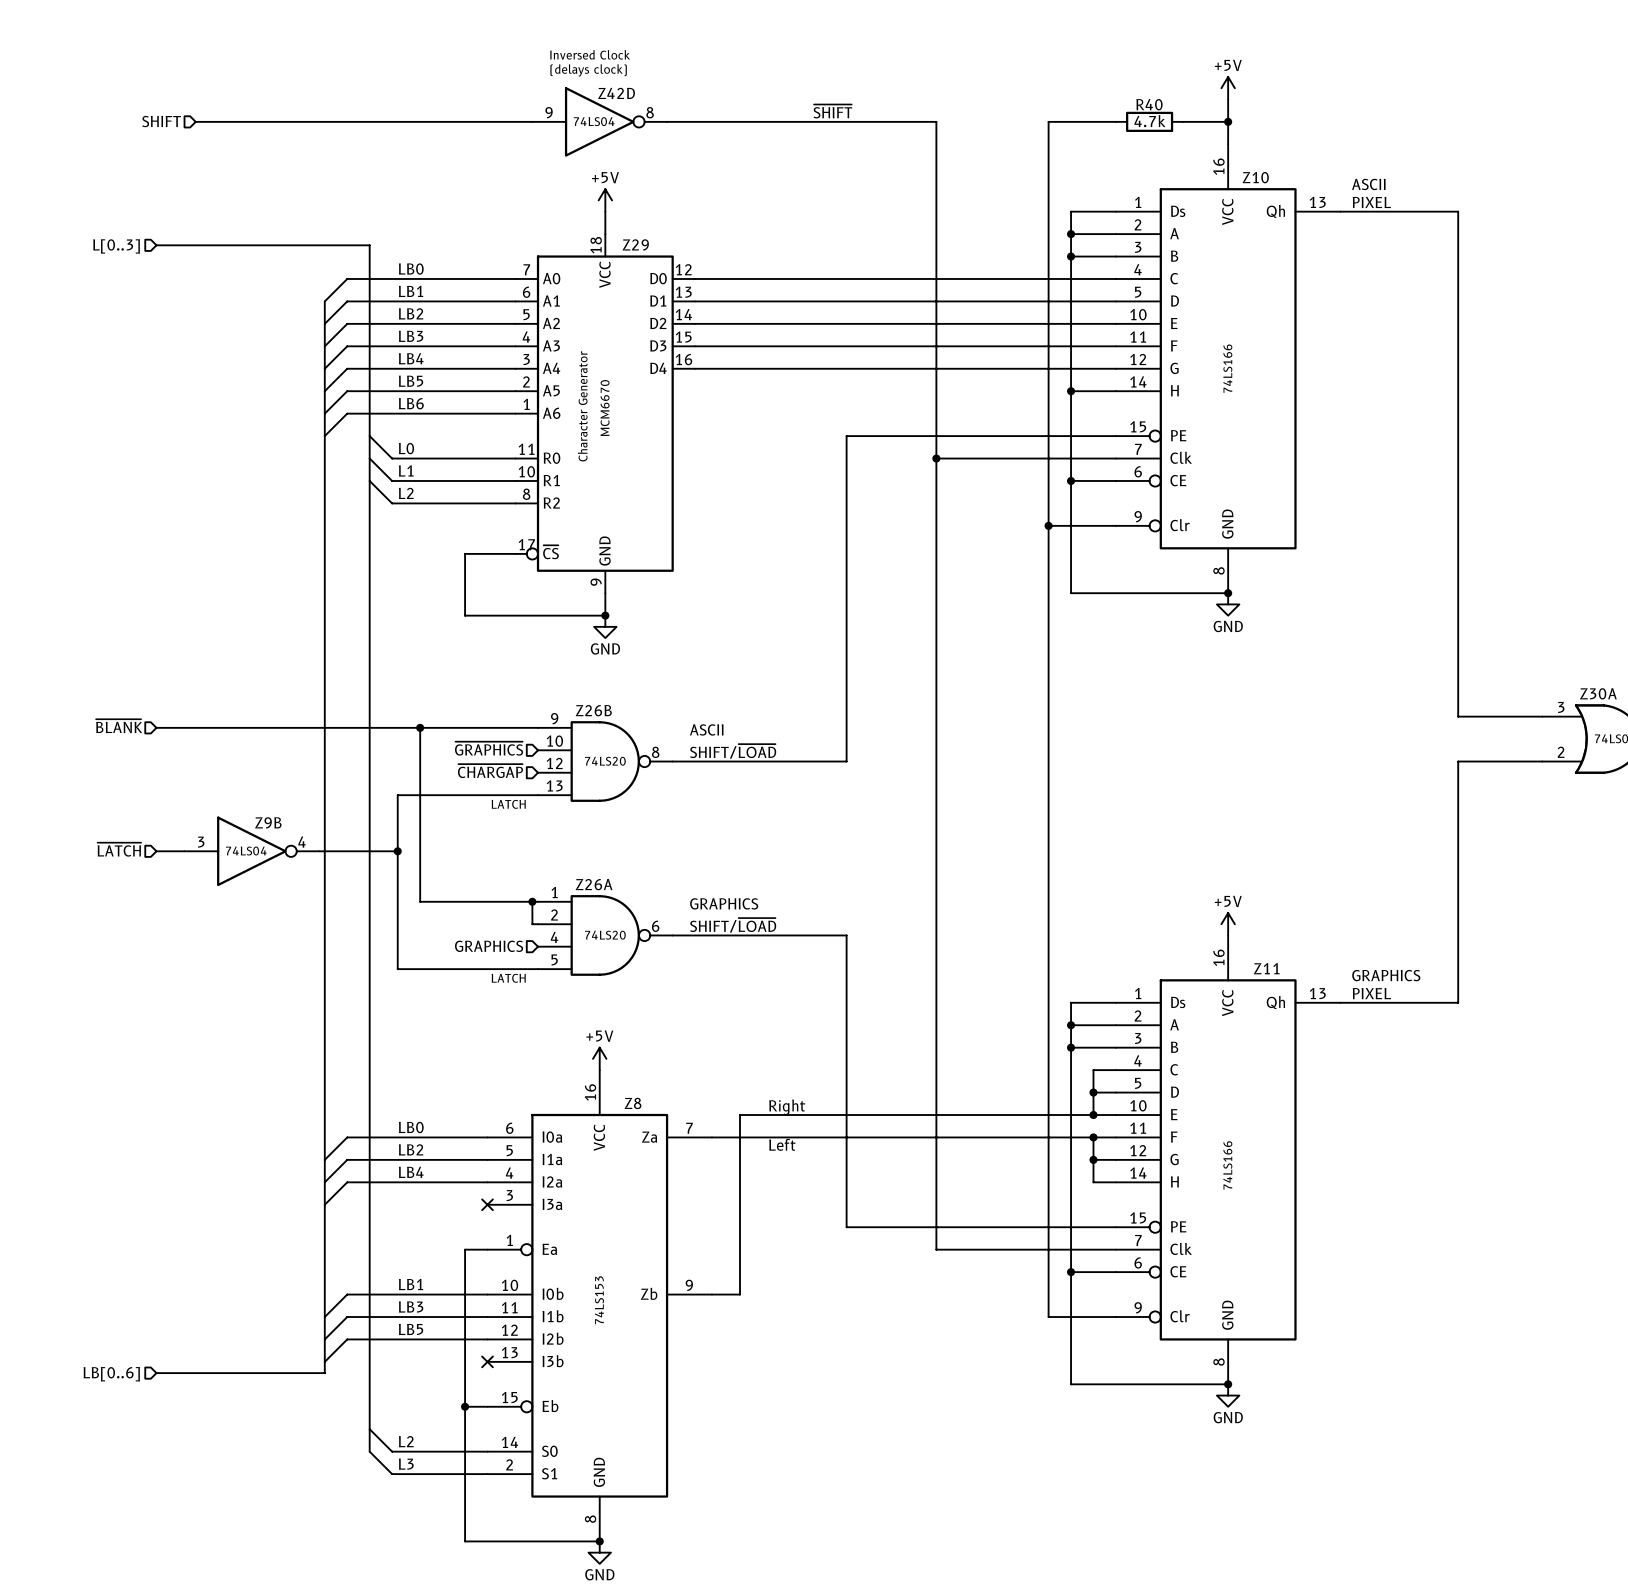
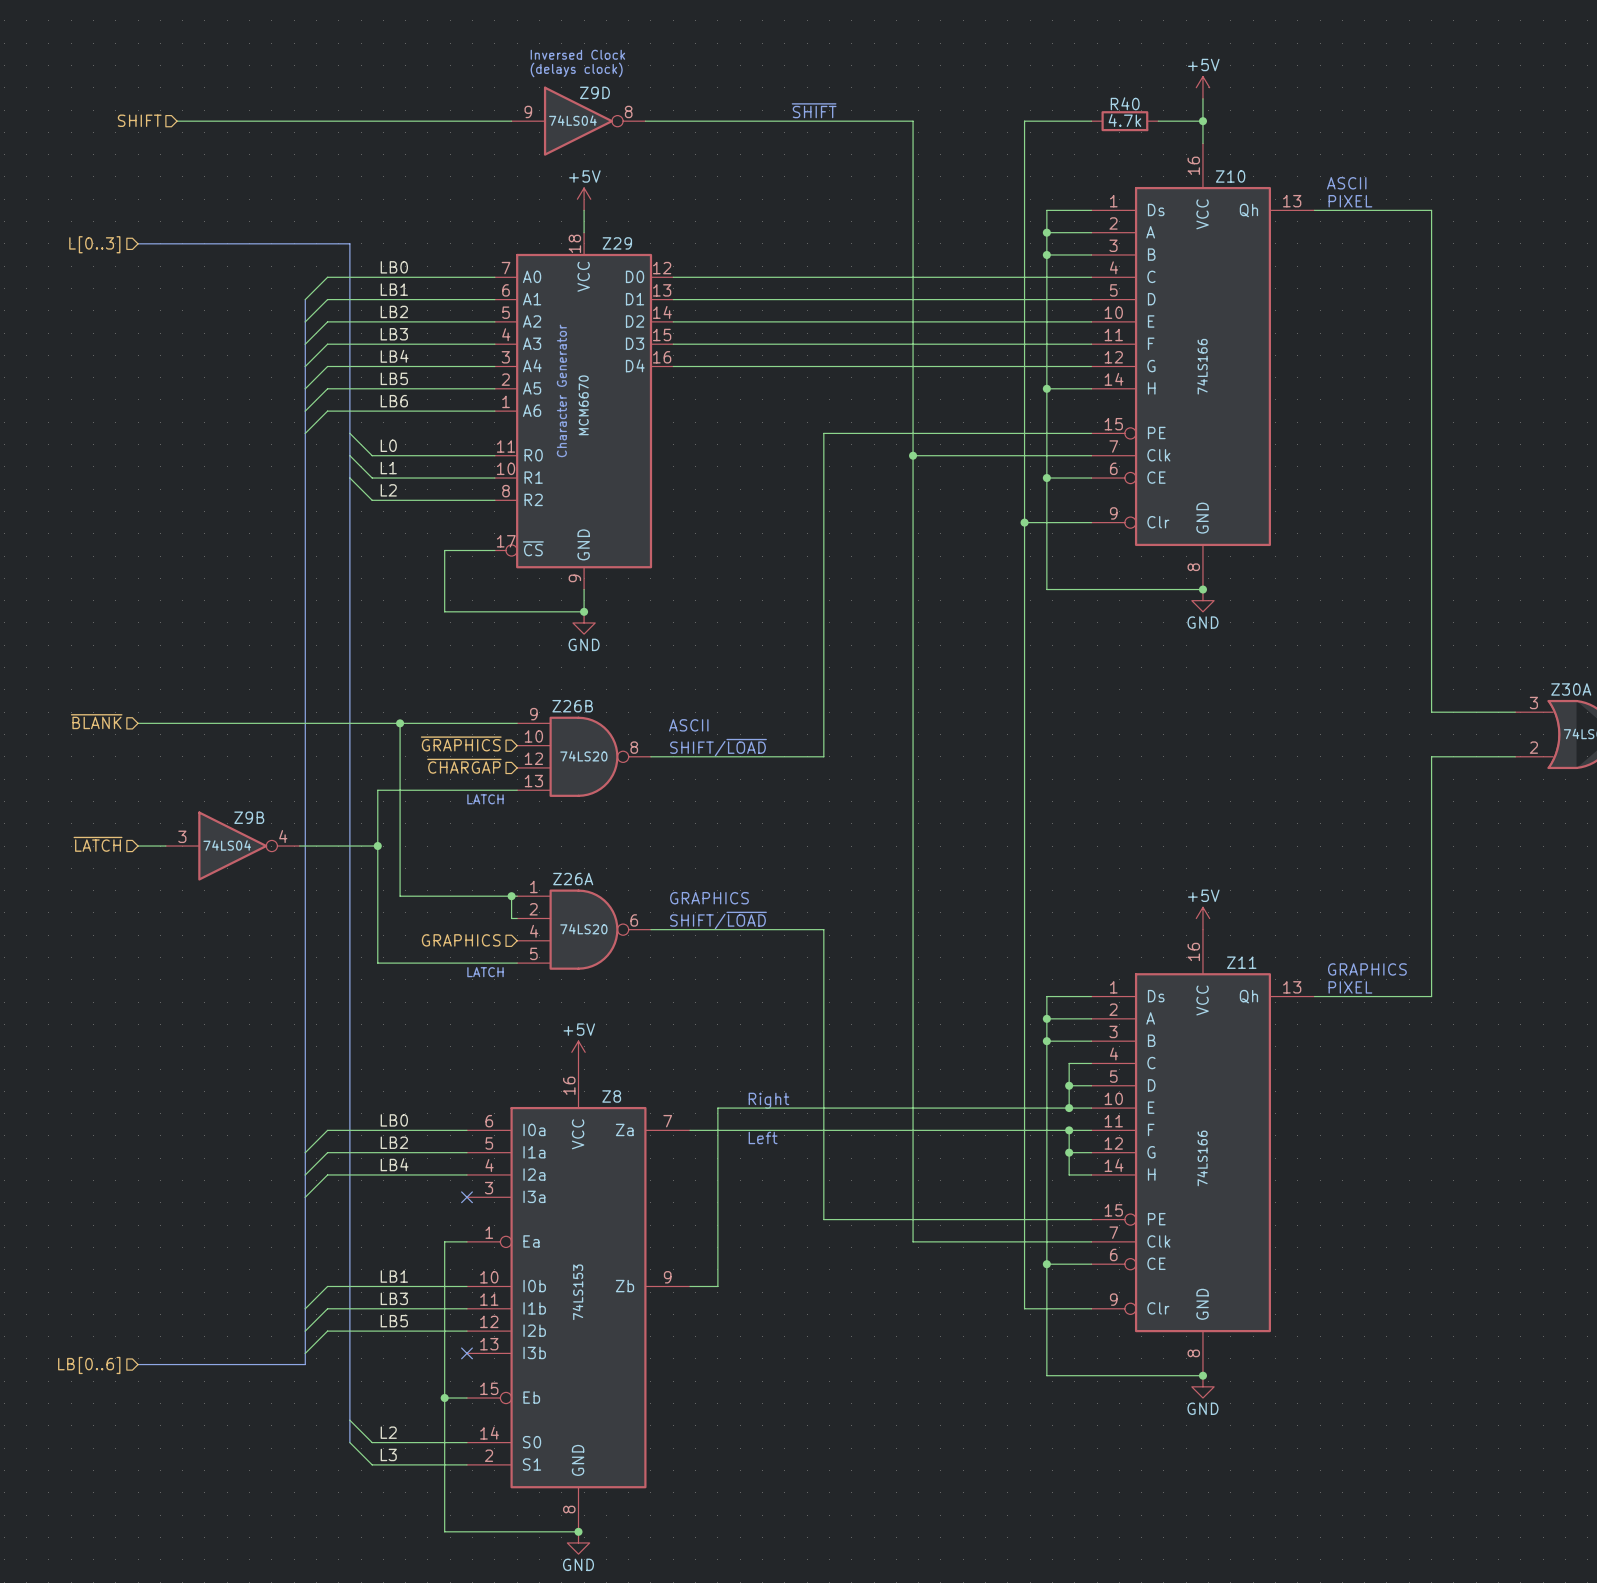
Z42D name: Z42D (616, 93) -> Z9D (594, 92)

